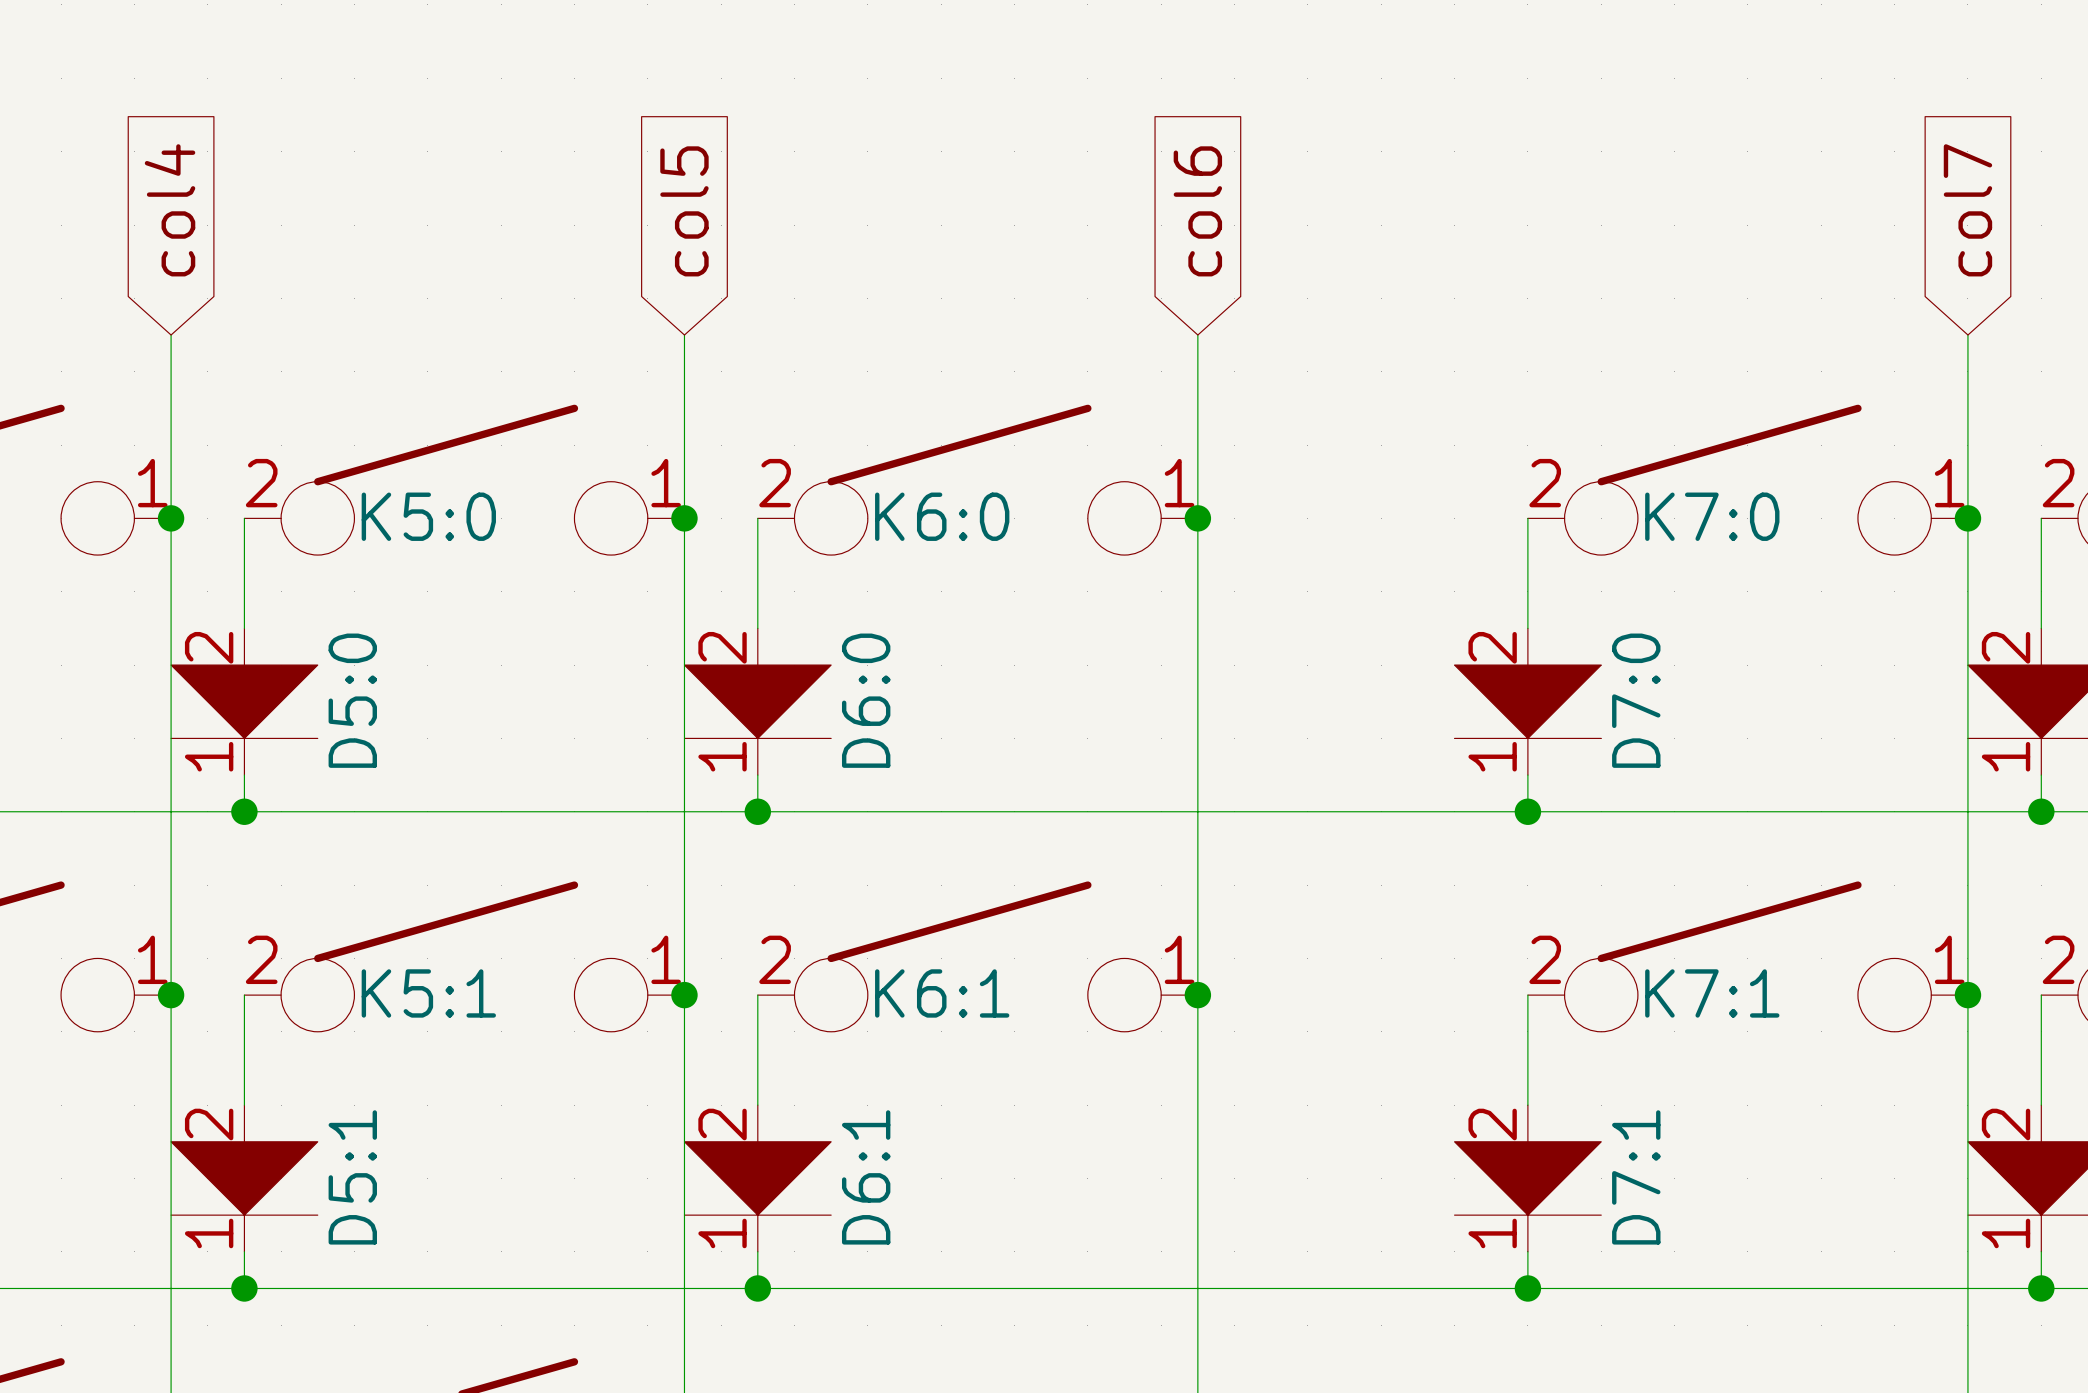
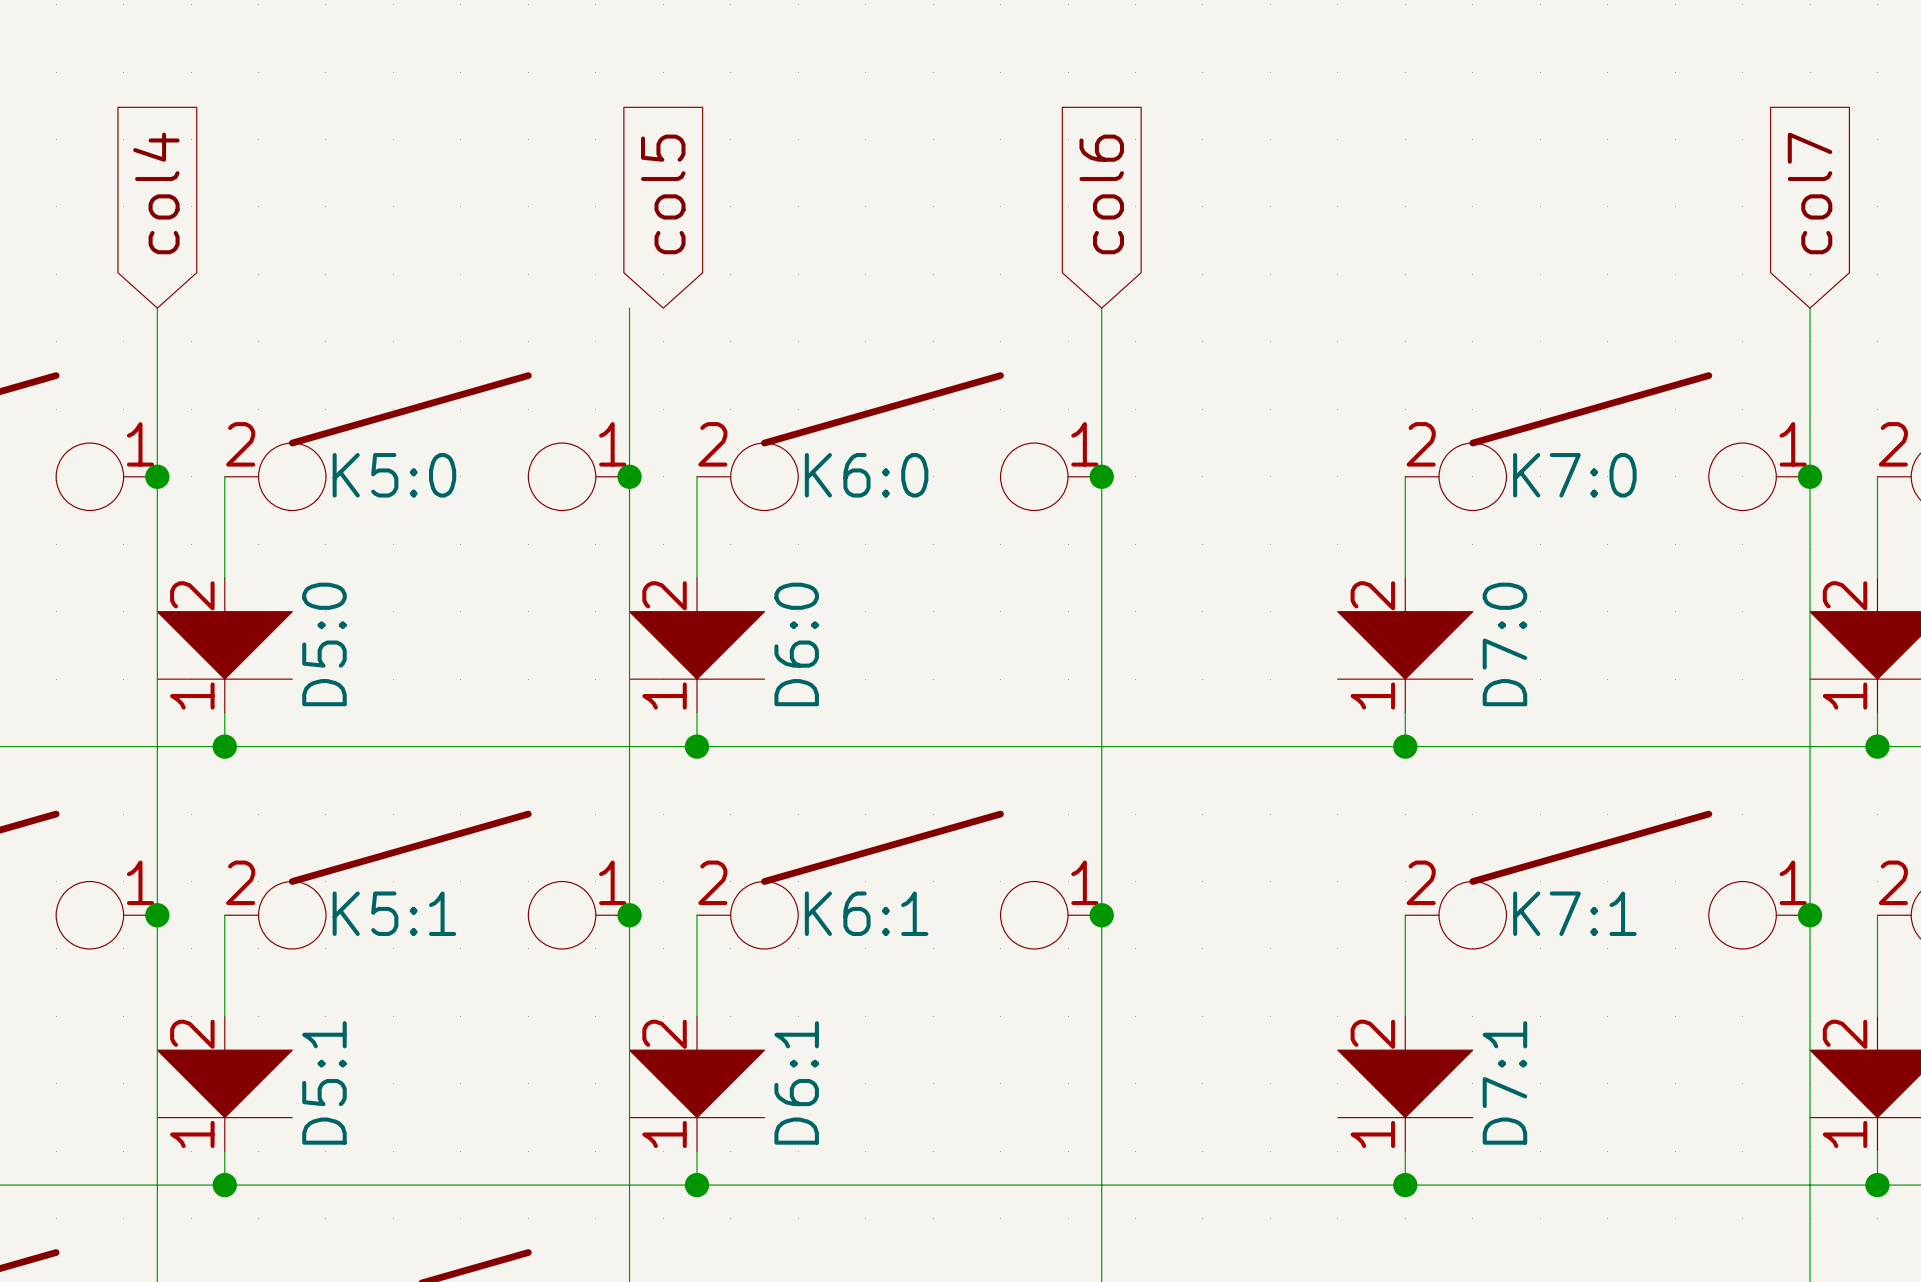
global label position: col5 (684, 211) -> col5 (663, 194)

